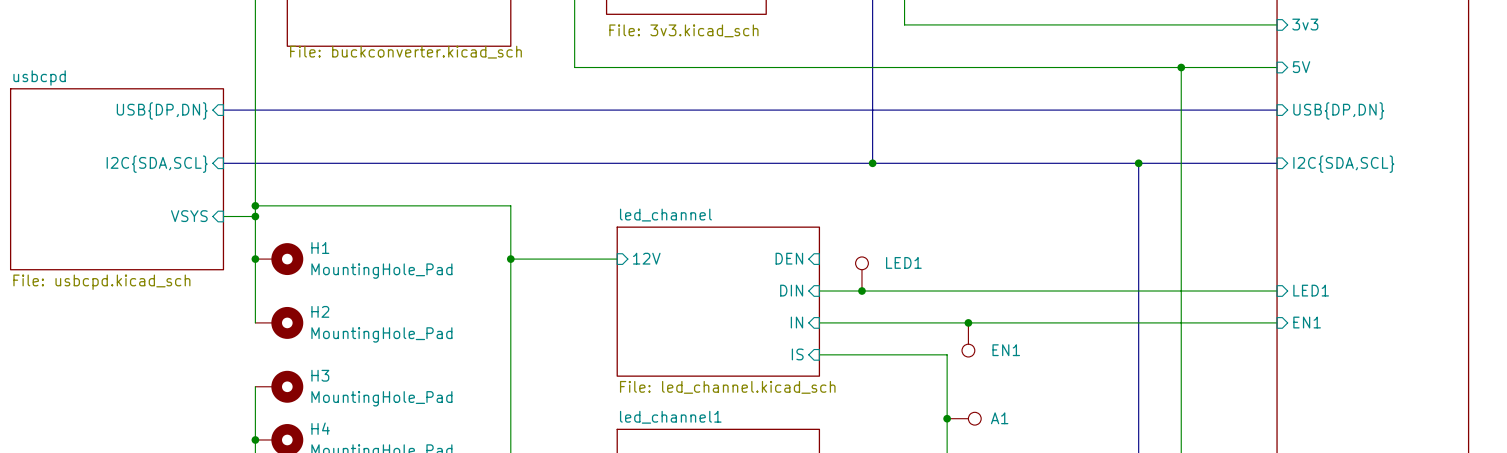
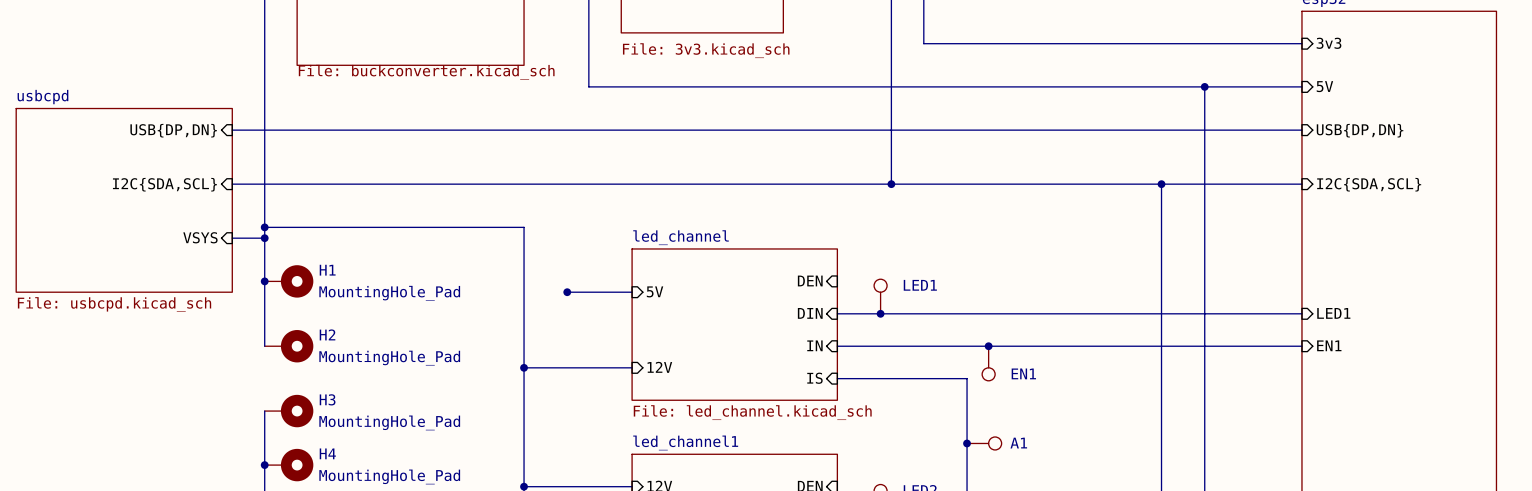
sheet pin position: 12V (646, 258) -> 12V (659, 367)
wire: (510, 259) (617, 259) -> (524, 367) (632, 367)
junction: (510, 259) -> none
wire: none -> (567, 292) (632, 292)
junction: none -> (567, 292)
sheet pin: none -> 5V (655, 291)
junction: none -> (524, 367)

